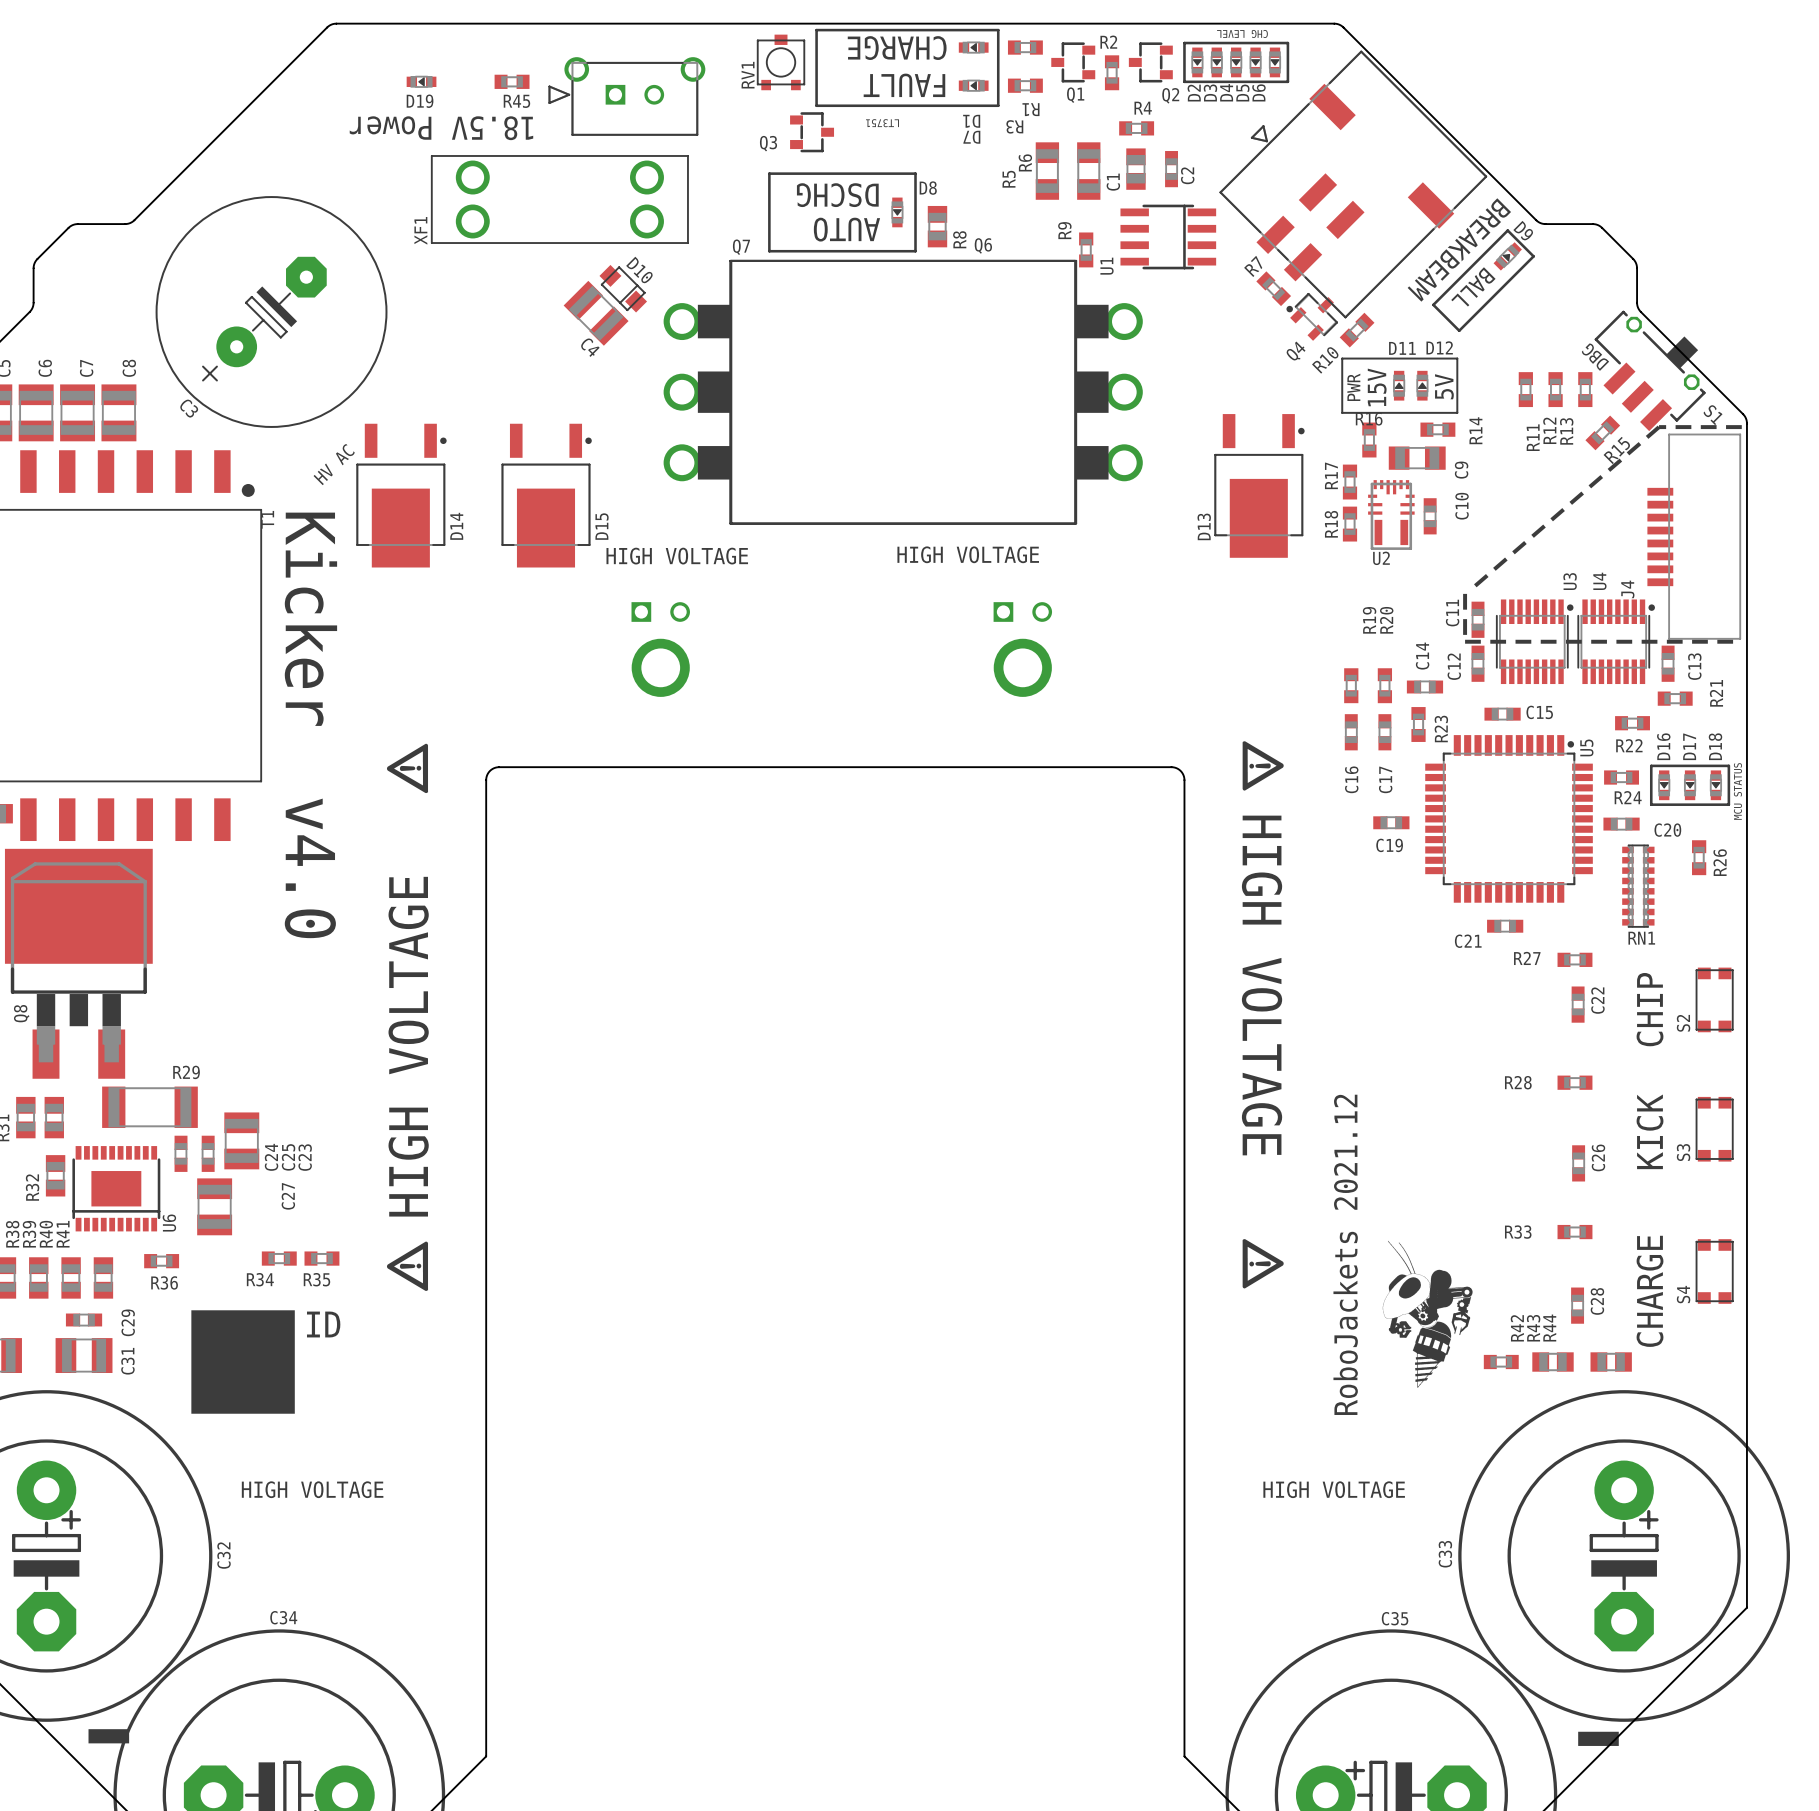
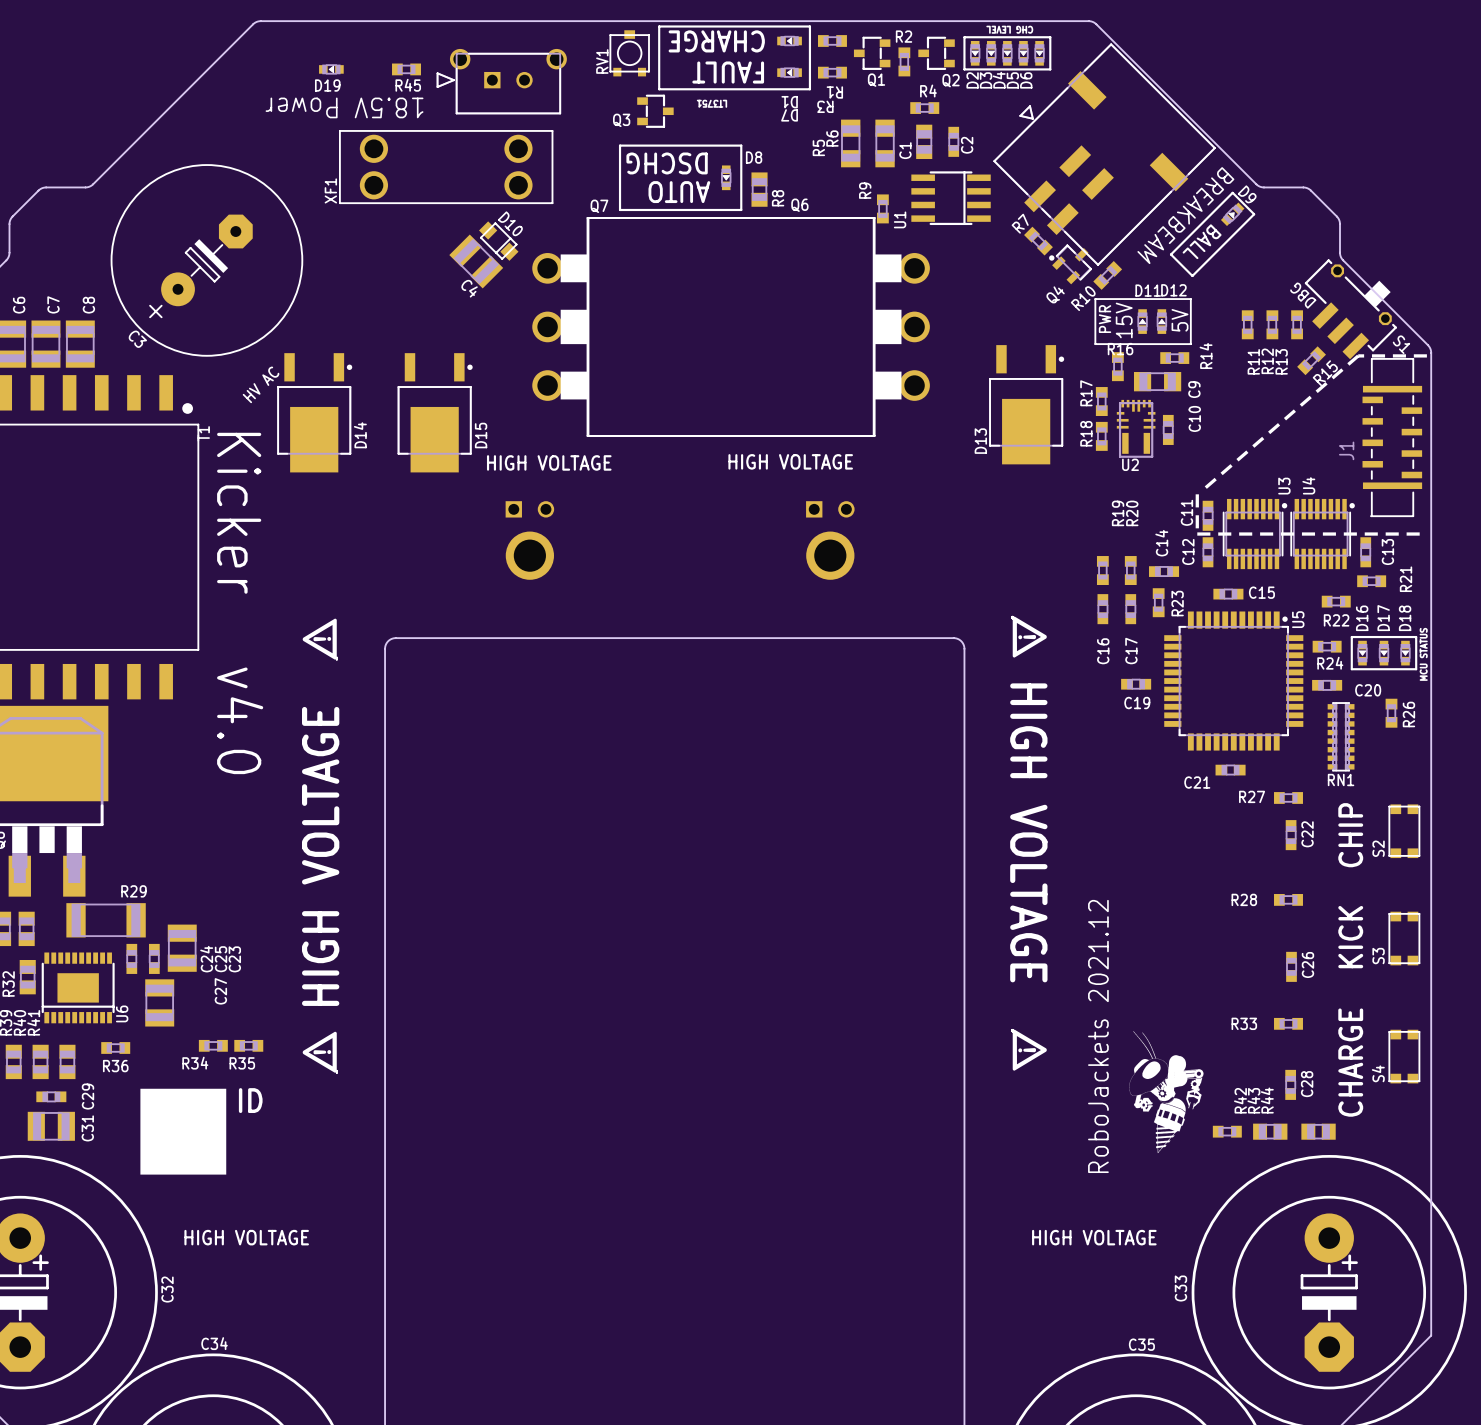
J1: none -> (1392, 437)
J4: (1694, 536) -> none

